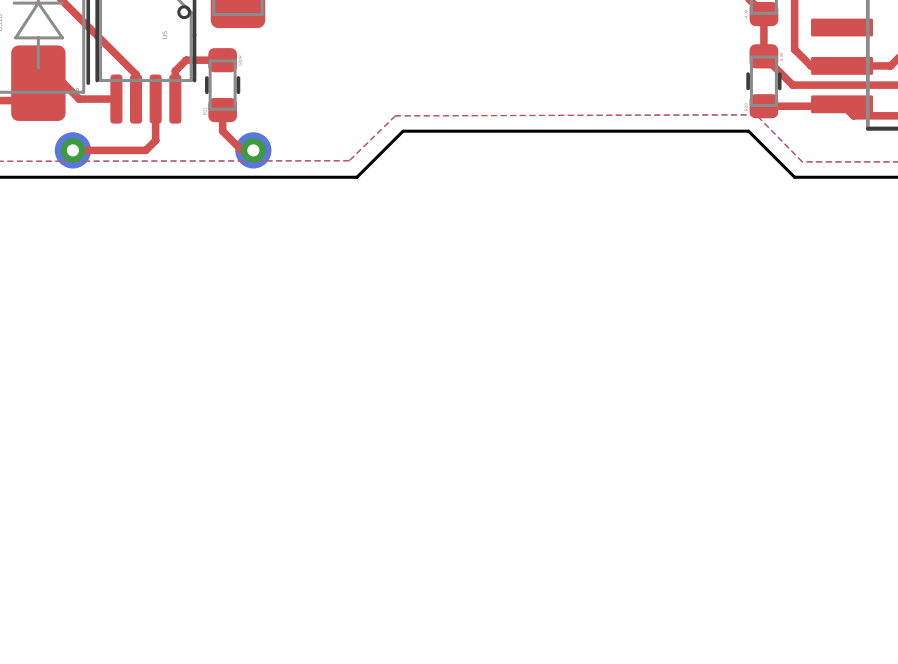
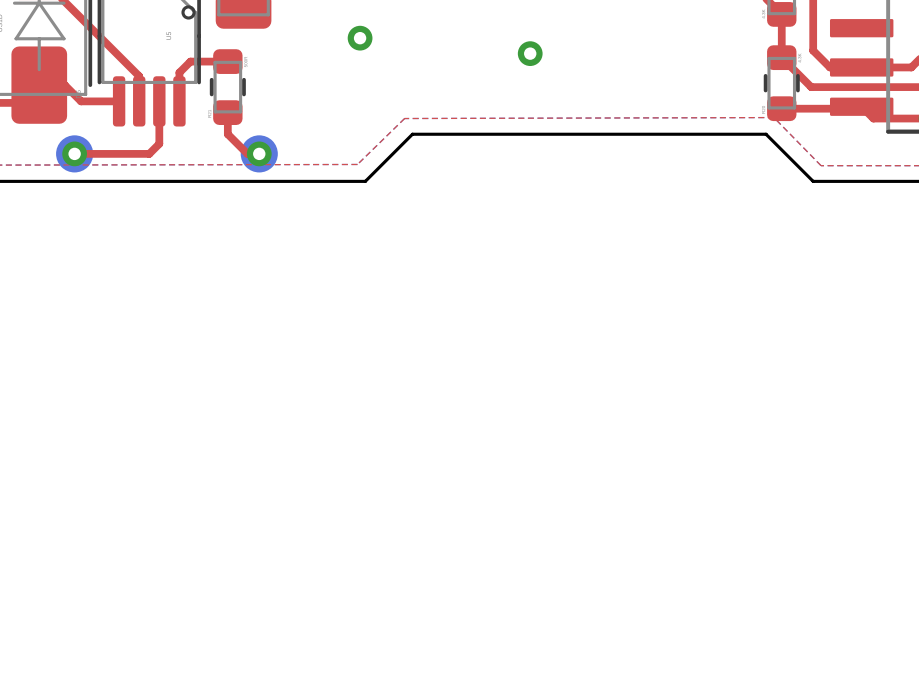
via: none -> (360, 38)
via: none -> (530, 53)

